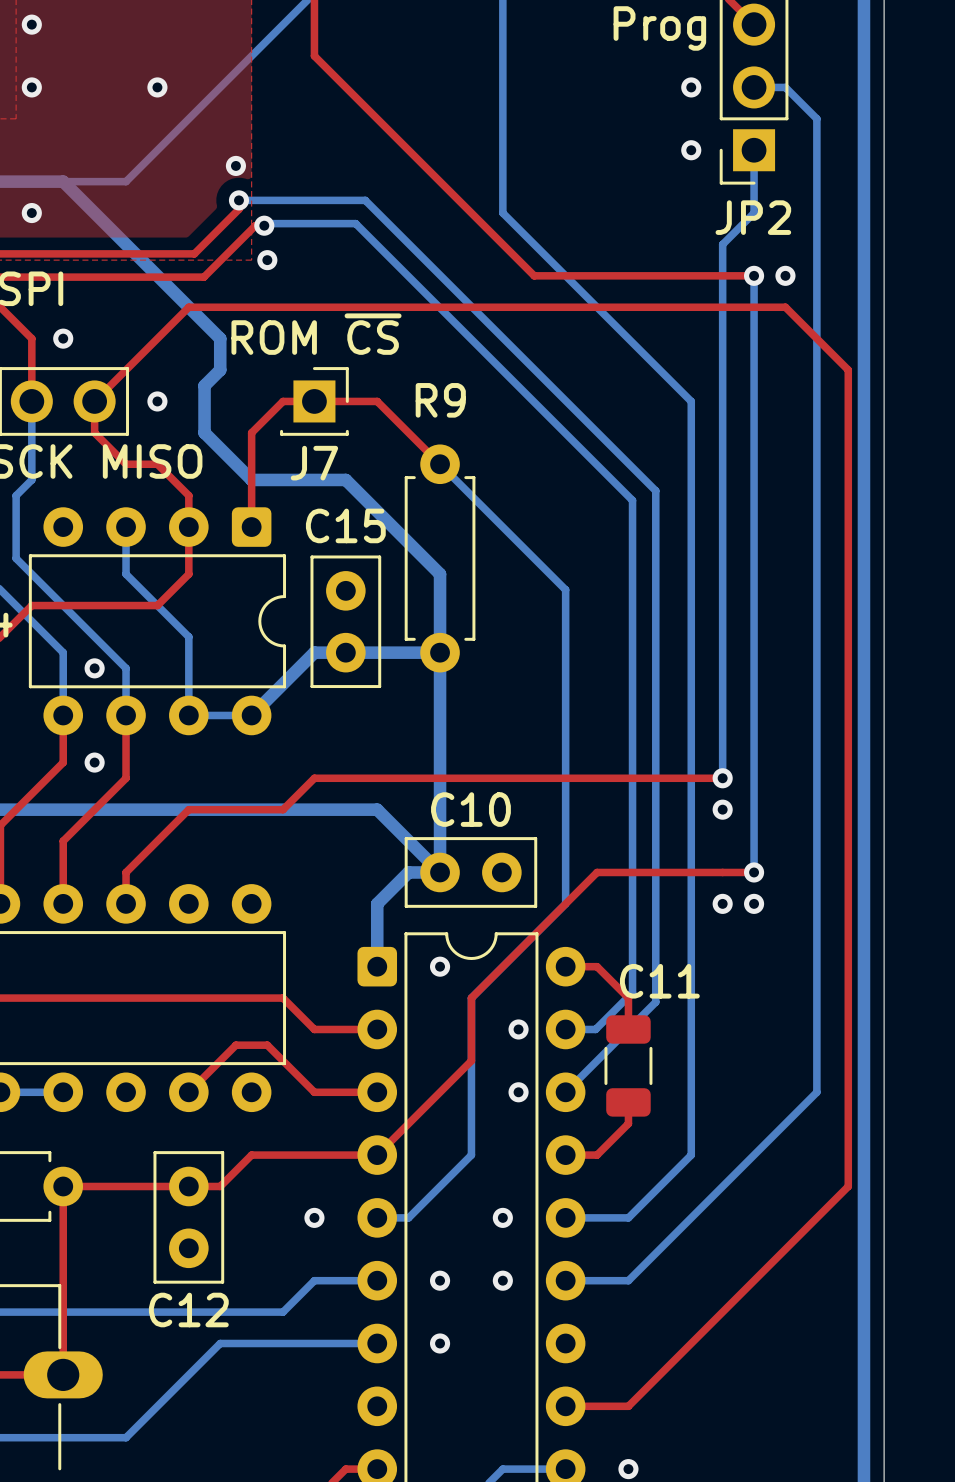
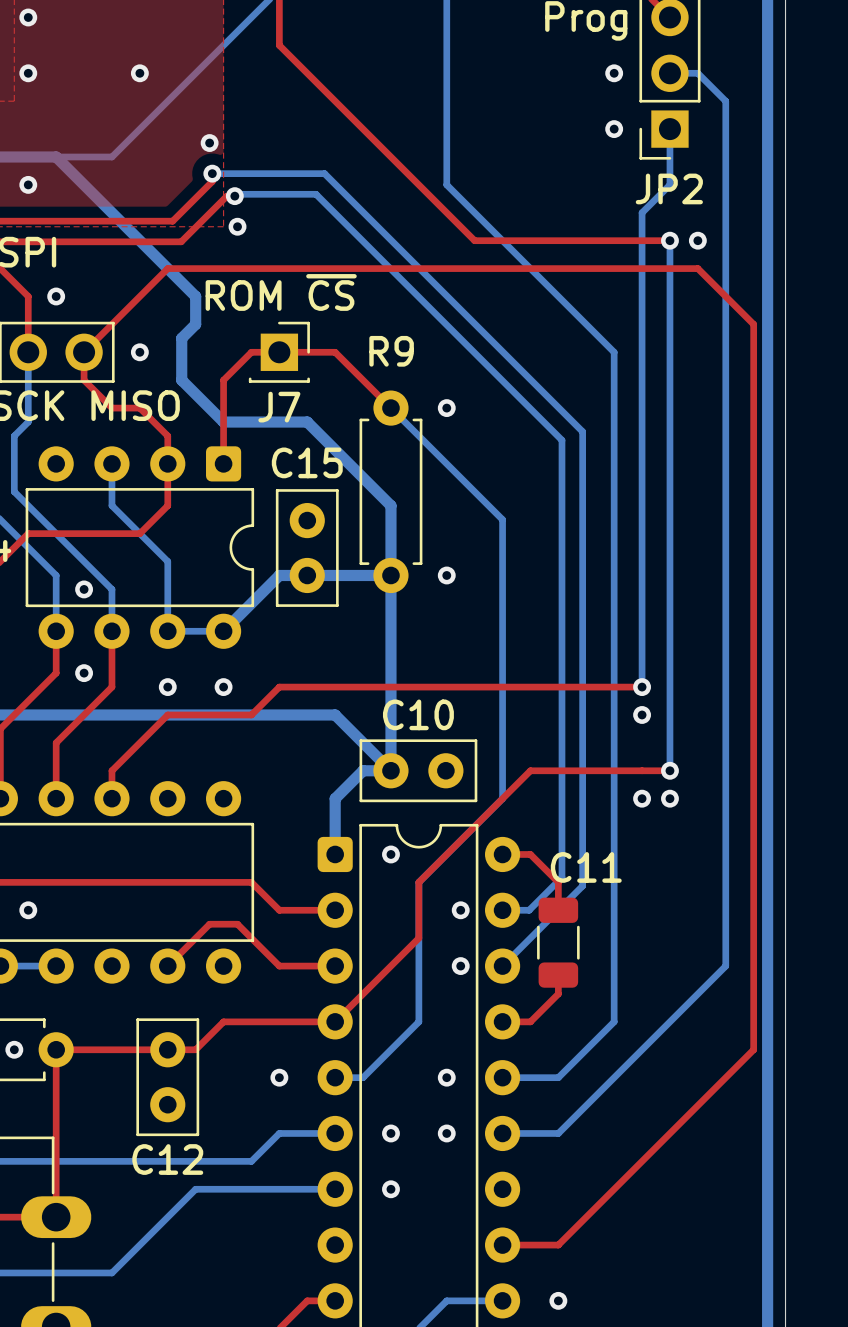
via: none -> (446, 408)
via: none -> (446, 575)
via: none -> (167, 687)
via: none -> (223, 687)
via: none -> (28, 910)
via: none -> (14, 1049)

